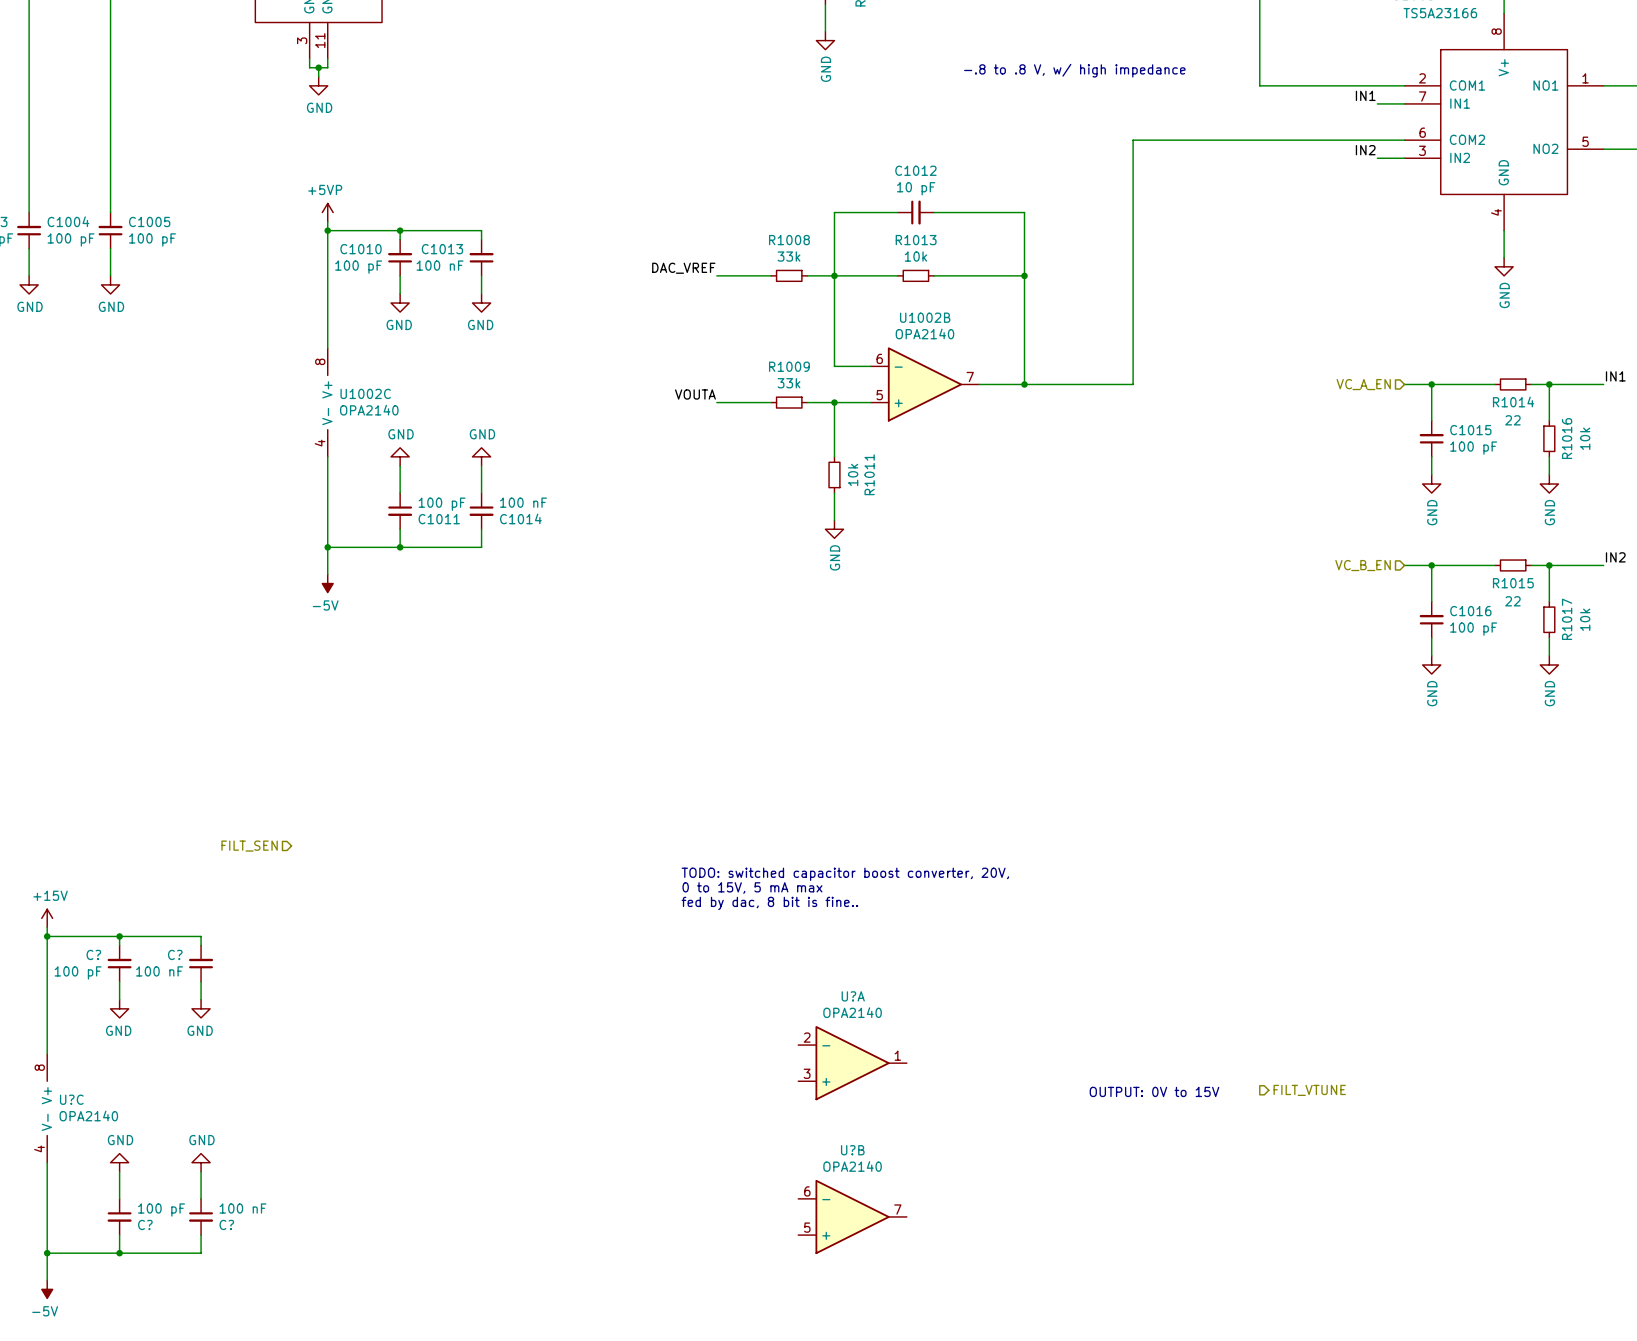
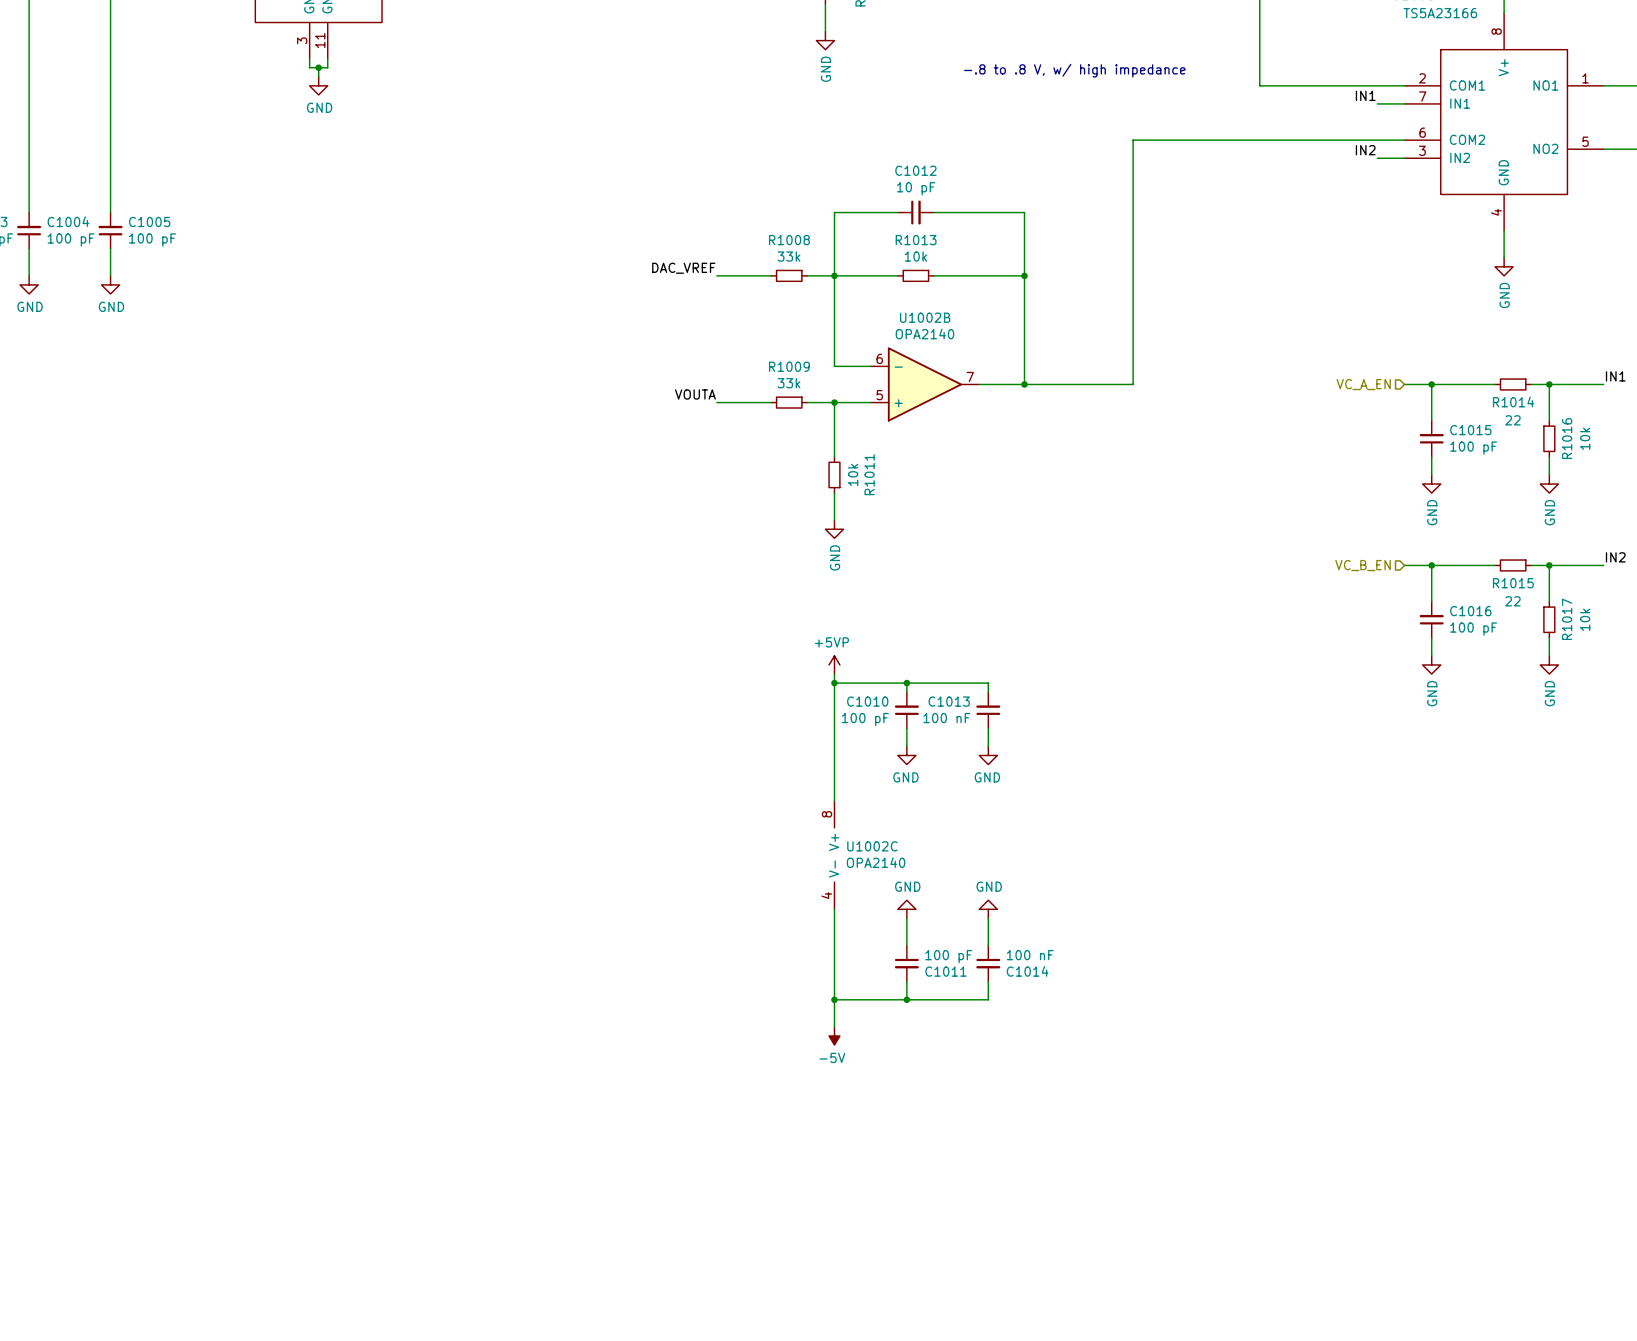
power symbol: +5VP (327, 212) -> none
wire: (327, 221) (327, 348) -> none
wire: (327, 230) (481, 230) (481, 239) -> none
junction: (327, 230) -> none
wire: (400, 230) (400, 239) -> none
junction: (400, 230) -> none
C1010 position: (400, 257) -> (906, 710)
C1013 position: (481, 257) -> (988, 710)
wire: (400, 275) (400, 293) -> none
wire: (481, 275) (481, 293) -> none
power symbol: GND (400, 303) -> none
power symbol: GND (481, 303) -> none
U1002C position: (327, 402) -> (834, 855)
wire: (327, 456) (327, 574) -> none
power symbol: GND (400, 456) -> none
power symbol: GND (481, 456) -> none
wire: (400, 465) (400, 493) -> none
wire: (481, 465) (481, 493) -> none
C1011 position: (400, 511) -> (906, 963)
C1014 position: (481, 511) -> (988, 963)
wire: (400, 529) (400, 547) -> none
wire: (481, 529) (481, 547) (327, 547) -> none
junction: (327, 547) -> none
junction: (400, 547) -> none
power symbol: -5V (327, 583) -> none
power symbol: none -> +5VP (834, 664)
wire: none -> (834, 674) (834, 800)
wire: none -> (834, 683) (988, 683) (988, 692)
junction: none -> (834, 683)
wire: none -> (906, 683) (906, 692)
junction: none -> (906, 683)
wire: none -> (906, 728) (906, 746)
wire: none -> (988, 728) (988, 746)
power symbol: none -> GND (906, 755)
power symbol: none -> GND (988, 755)
hierarchical label: FILT_SEN (249, 846) -> none
text: TODO: switched capacitor boost converter, 20V, (845, 874) -> none
text: 0 to 15V, 5 mA max (752, 887) -> none
text: fed by dac, 8 bit is fine.. (769, 903) -> none
wire: none -> (834, 909) (834, 1026)
power symbol: none -> GND (906, 909)
power symbol: none -> GND (988, 909)
power symbol: +15V (47, 918) -> none
wire: none -> (906, 918) (906, 945)
wire: none -> (988, 918) (988, 945)
wire: (47, 927) (47, 1054) -> none
wire: (47, 936) (201, 936) (201, 945) -> none
junction: (47, 936) -> none
wire: (119, 936) (119, 945) -> none
junction: (119, 936) -> none
C?: 100 pF (119, 963) -> none
C?: 100 nF (201, 963) -> none
wire: (119, 981) (119, 999) -> none
wire: (201, 981) (201, 999) -> none
wire: none -> (906, 981) (906, 999)
wire: none -> (988, 981) (988, 999) (834, 999)
junction: none -> (834, 999)
junction: none -> (906, 999)
power symbol: GND (119, 1008) -> none
power symbol: GND (201, 1008) -> none
power symbol: none -> -5V (834, 1036)
U?A: OPA2140 (852, 1063) -> none
hierarchical label: FILT_VTUNE (1309, 1090) -> none
text: OUTPUT: 0V to 15V (1154, 1091) -> none
U?C: OPA2140 (47, 1108) -> none
wire: (47, 1162) (47, 1280) -> none
power symbol: GND (119, 1162) -> none
power symbol: GND (201, 1162) -> none
wire: (119, 1171) (119, 1198) -> none
wire: (201, 1171) (201, 1198) -> none
C?: 100 pF (119, 1216) -> none
C?: 100 nF (201, 1216) -> none
U?B: OPA2140 (852, 1216) -> none
wire: (119, 1235) (119, 1253) -> none
wire: (201, 1235) (201, 1253) (47, 1253) -> none
junction: (47, 1253) -> none
junction: (119, 1253) -> none
power symbol: -5V (47, 1289) -> none

